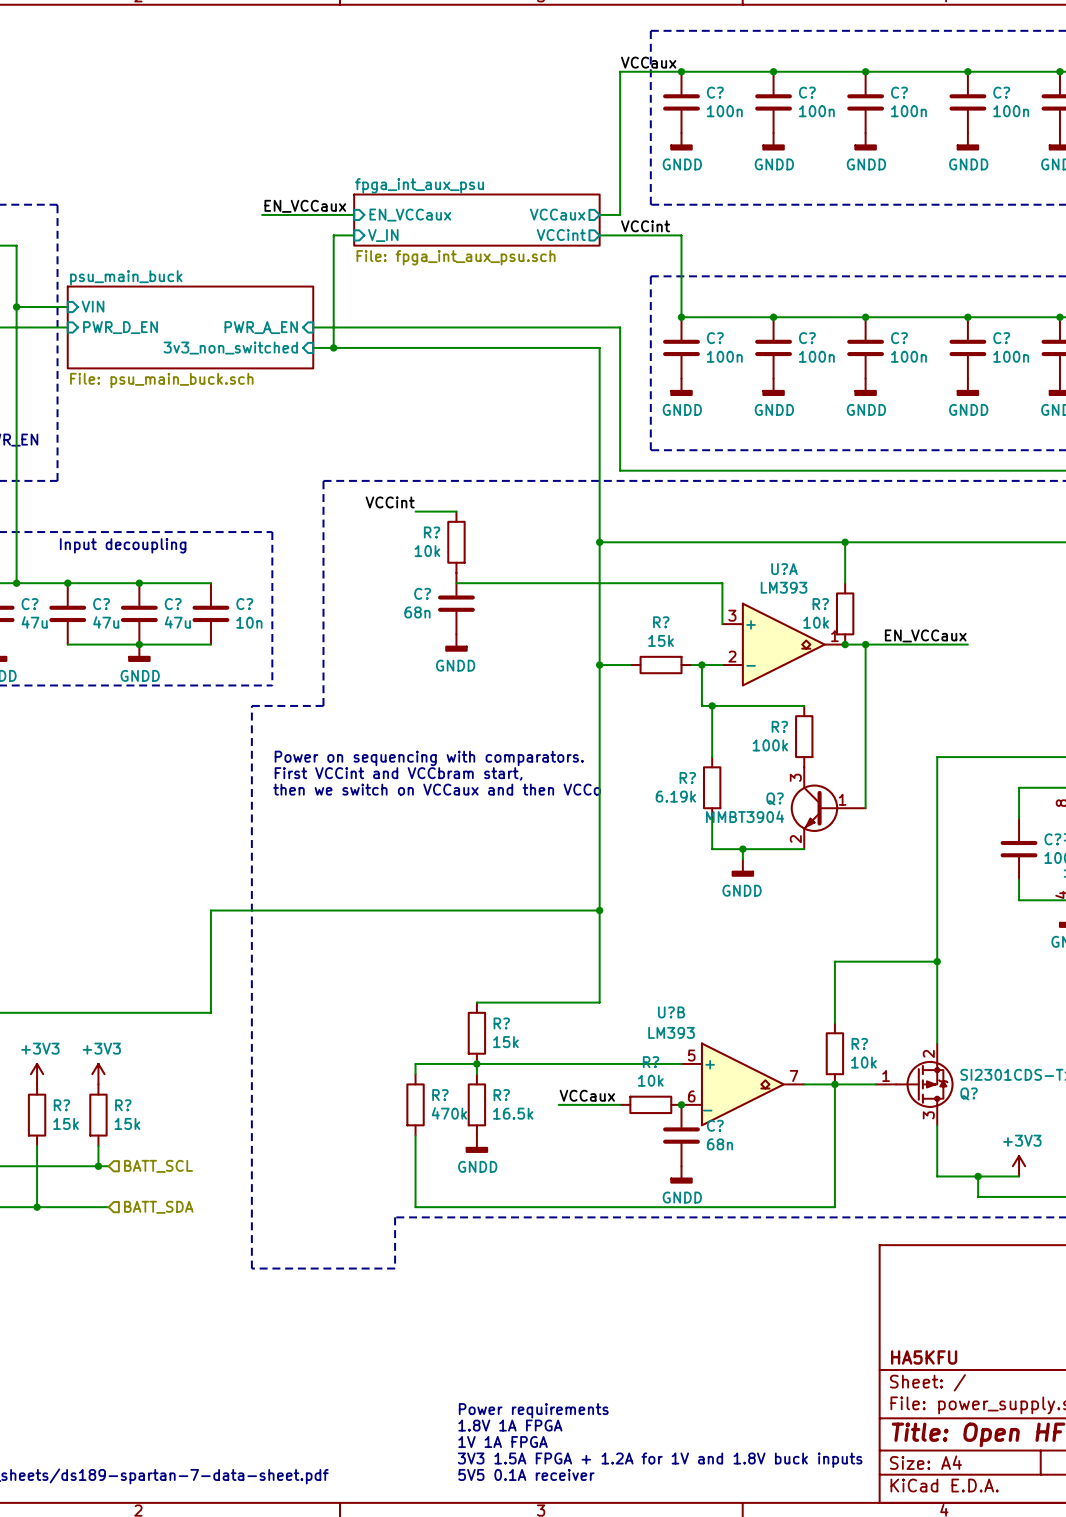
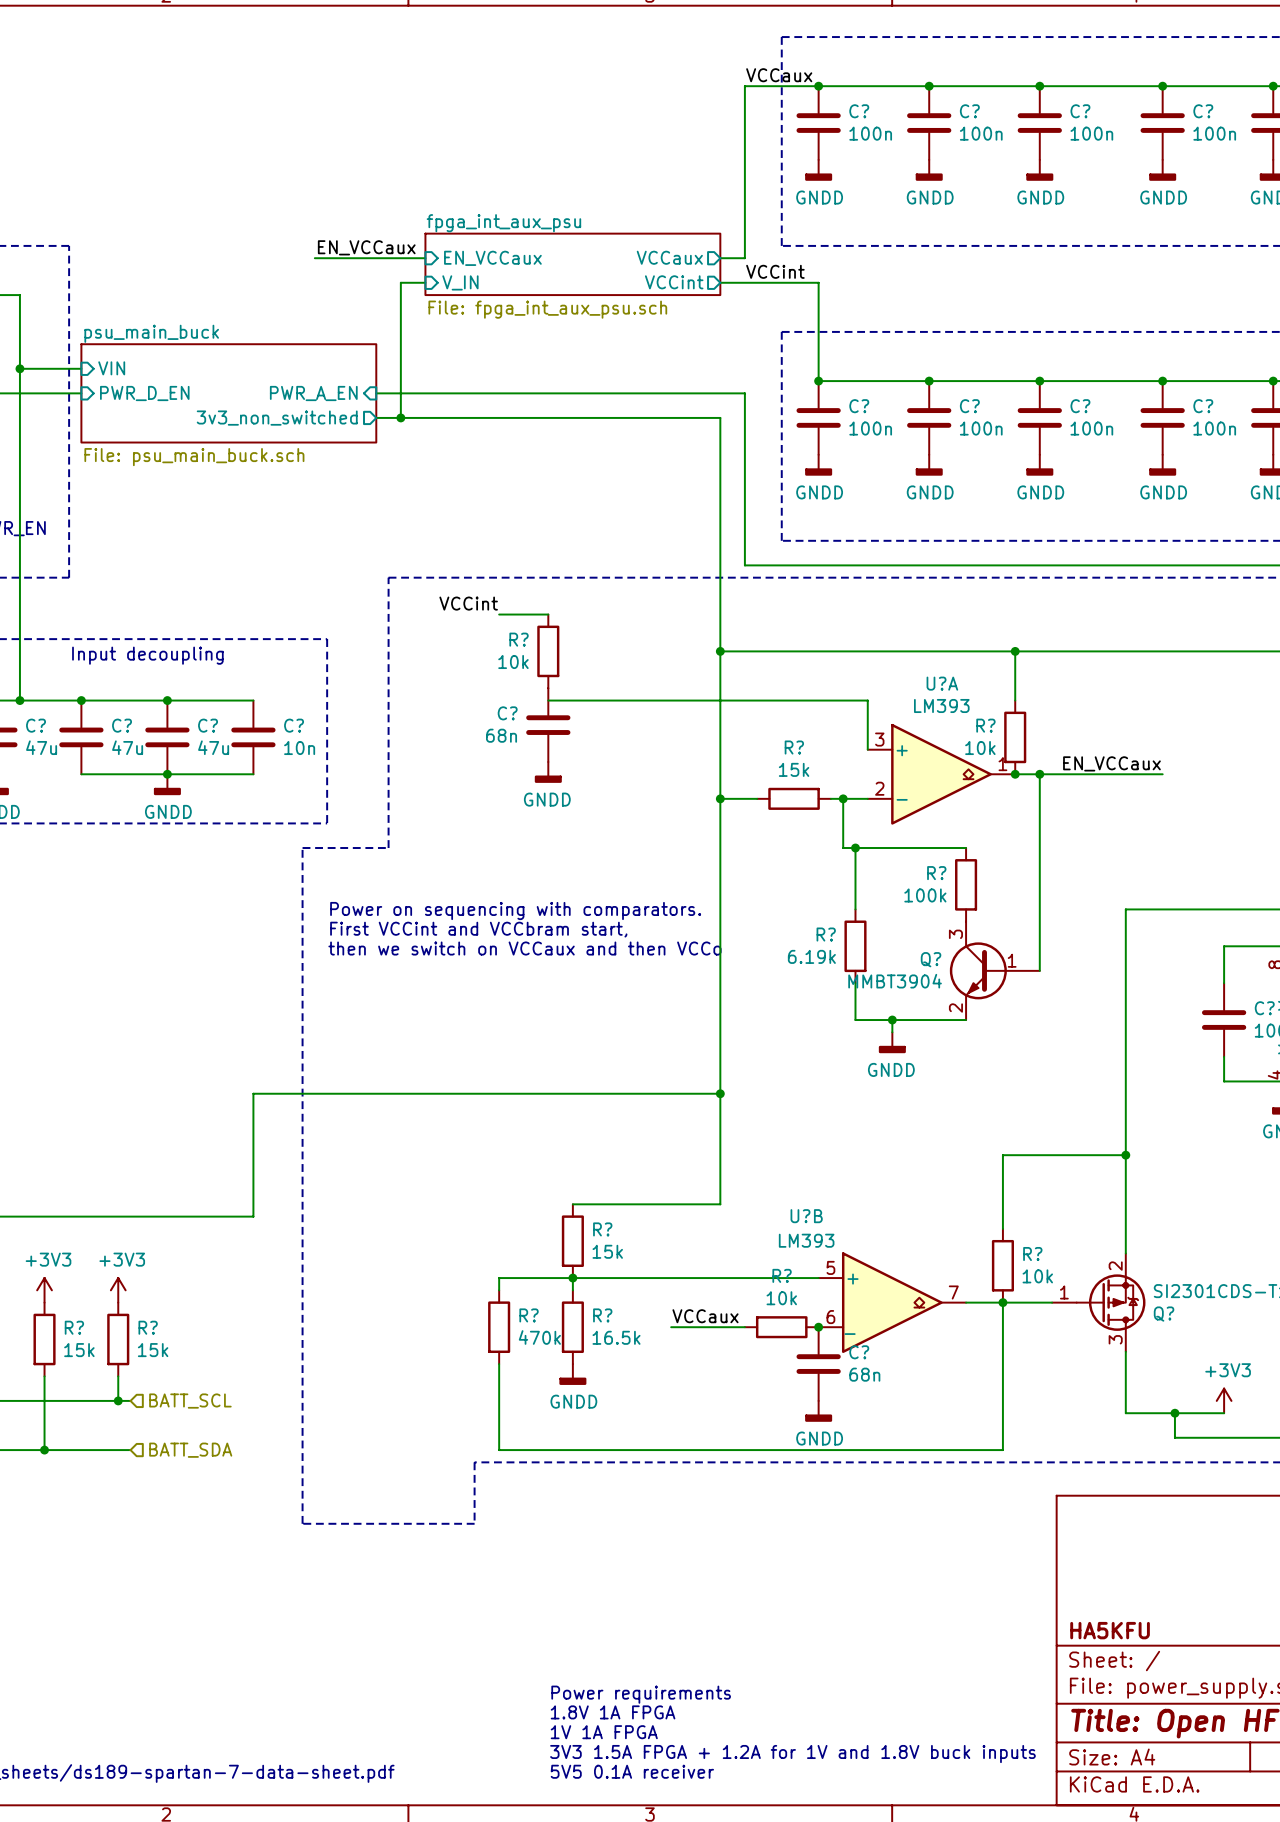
sheet pin shape: input (230, 348) -> output (277, 418)

